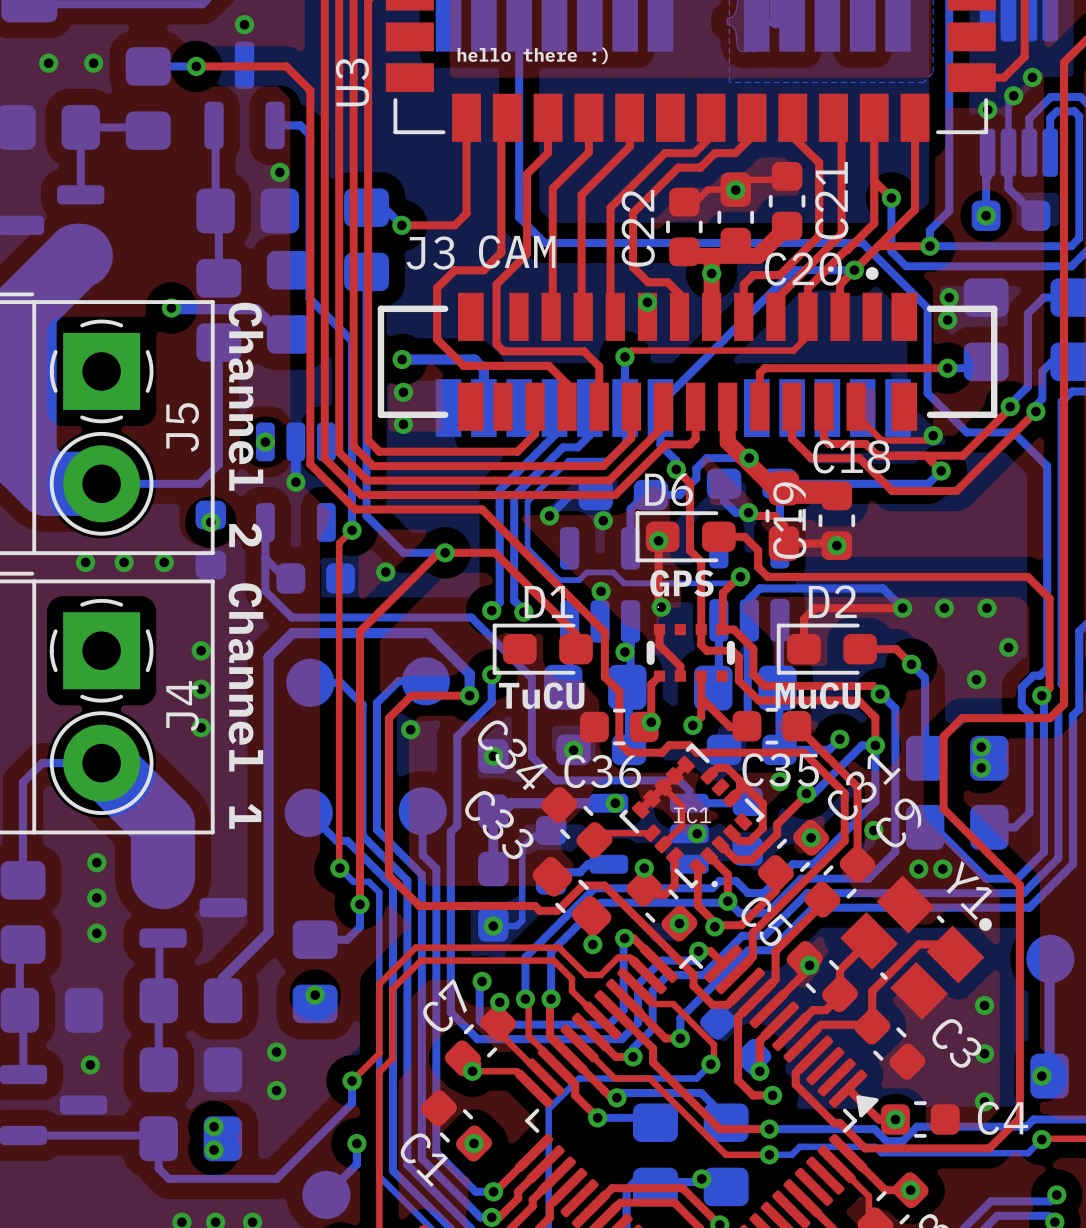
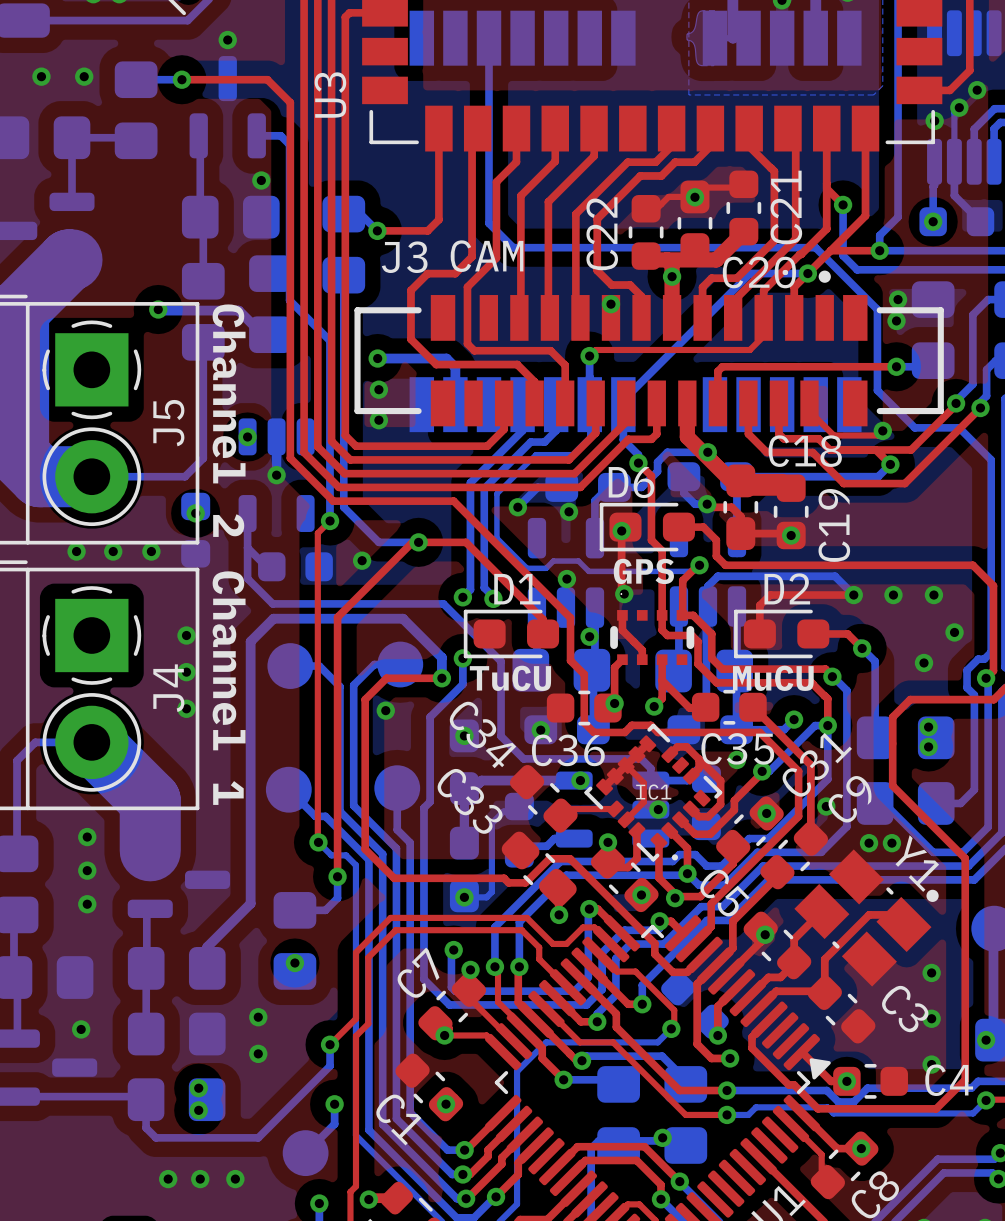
text: hello there :) (532, 55) -> none
C19 name position: C19 (789, 520) -> C19 (834, 525)

